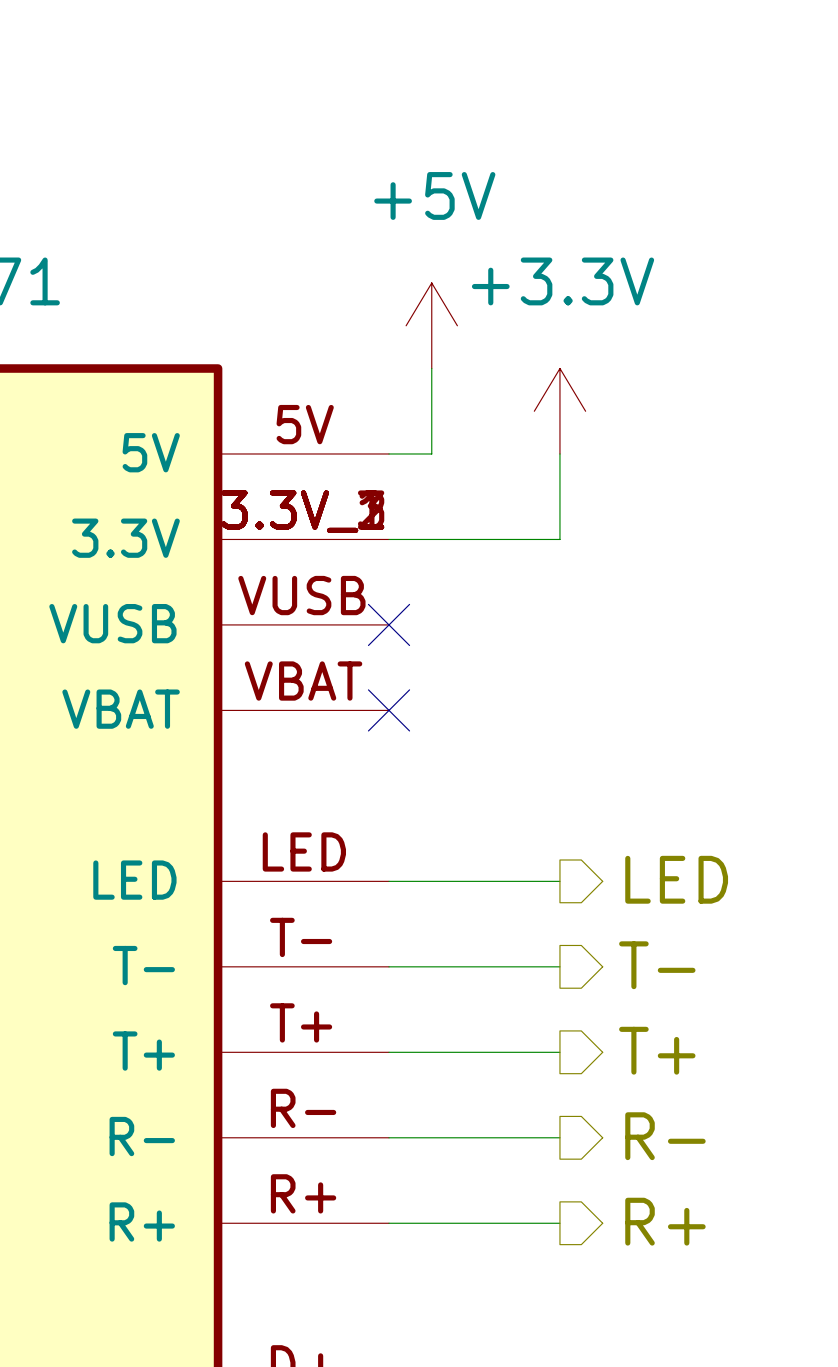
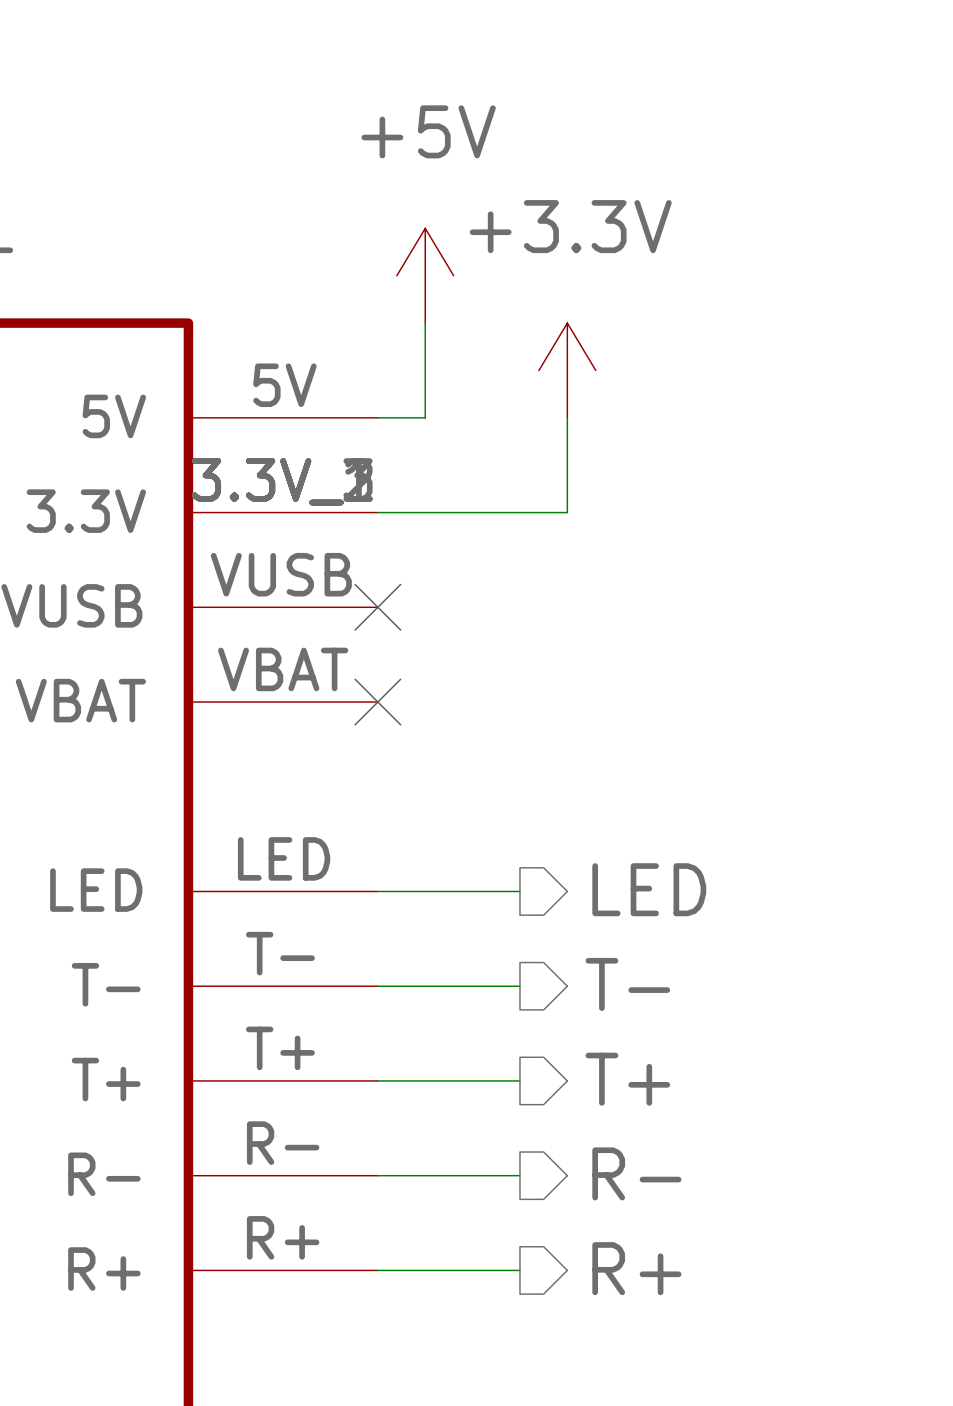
hierarchical label position: LED (676, 879) -> LED (649, 889)
wire: (517, 881) (559, 881) -> none
hierarchical label position: T- (657, 965) -> T- (627, 984)
wire: (517, 966) (559, 966) -> none
hierarchical label position: T+ (657, 1050) -> T+ (627, 1079)
wire: (517, 1052) (559, 1052) -> none
hierarchical label position: R- (665, 1136) -> R- (636, 1173)
wire: (517, 1137) (559, 1137) -> none
hierarchical label position: R+ (665, 1221) -> R+ (636, 1268)
wire: (517, 1223) (559, 1223) -> none

